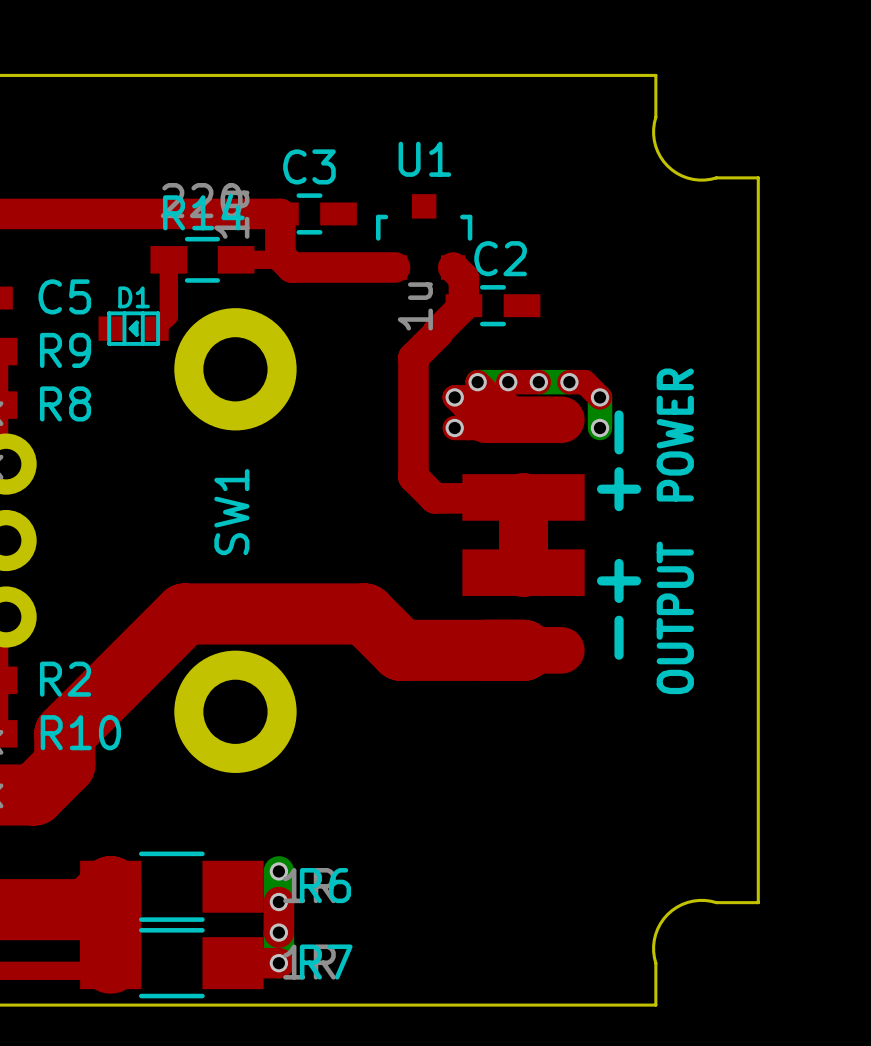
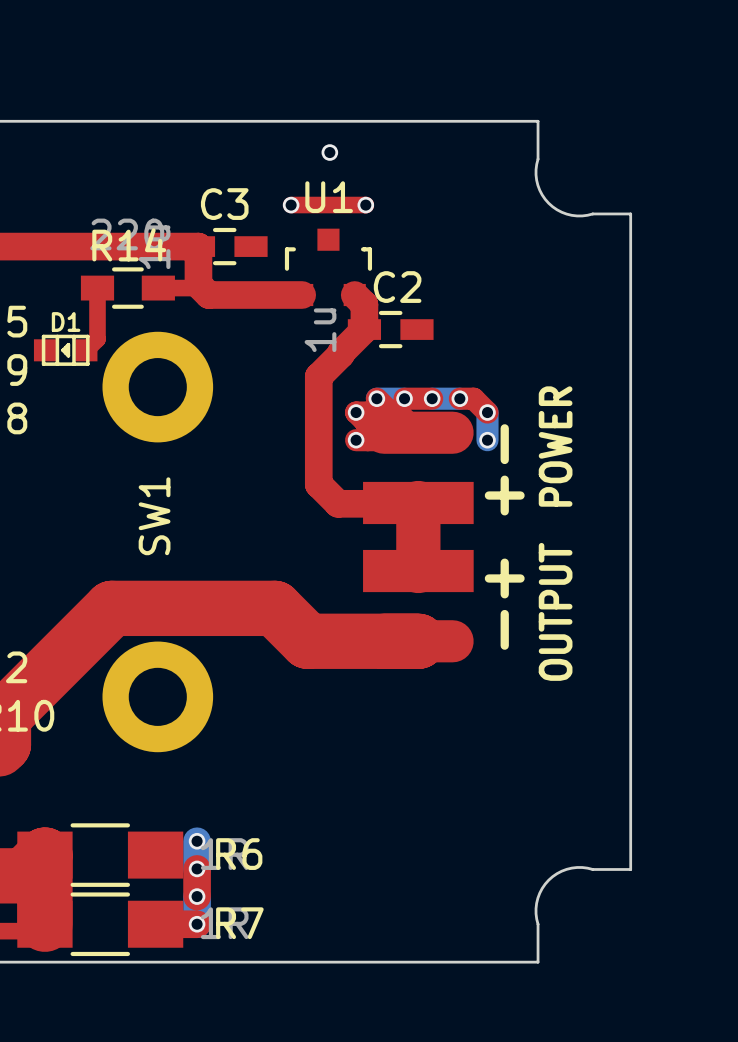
via: none -> (329, 152)
top track: none -> (291, 205) (365, 205)
via: none -> (291, 205)
via: none -> (365, 205)

